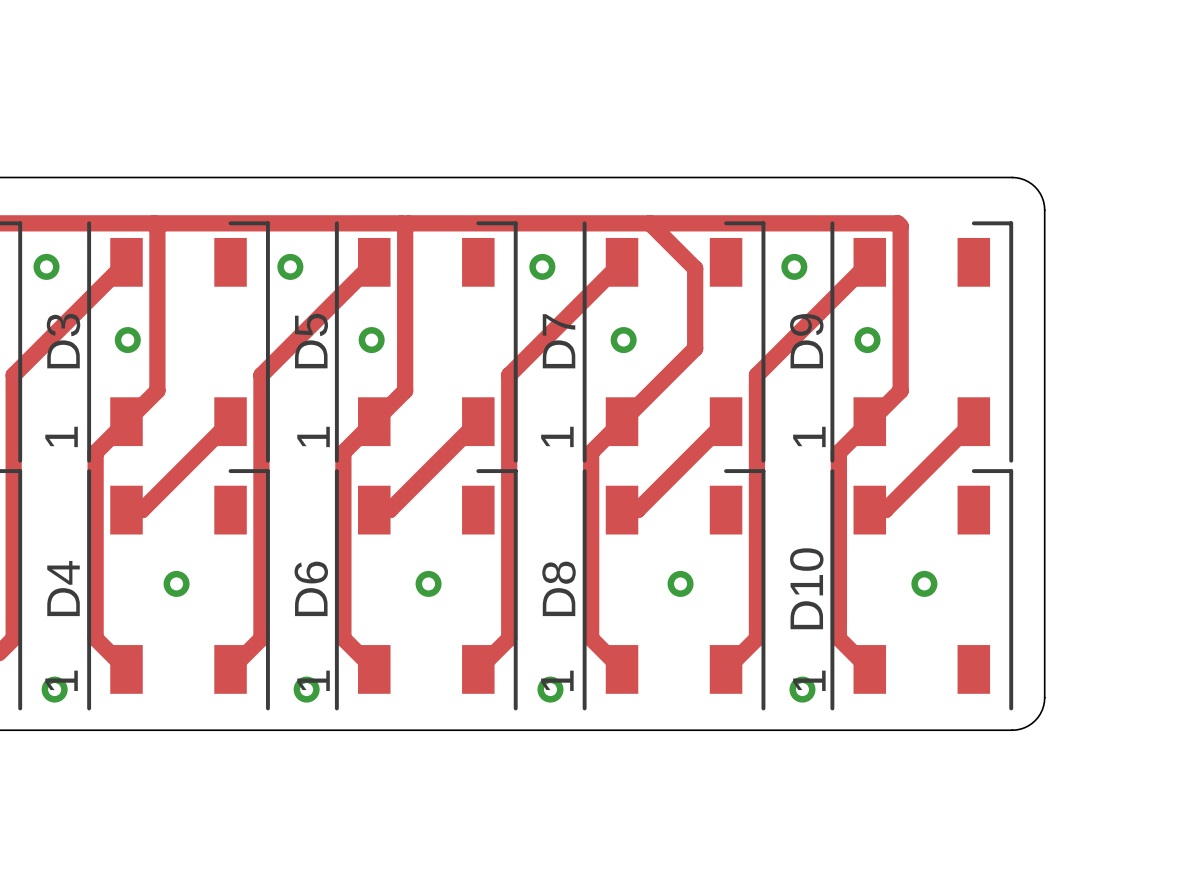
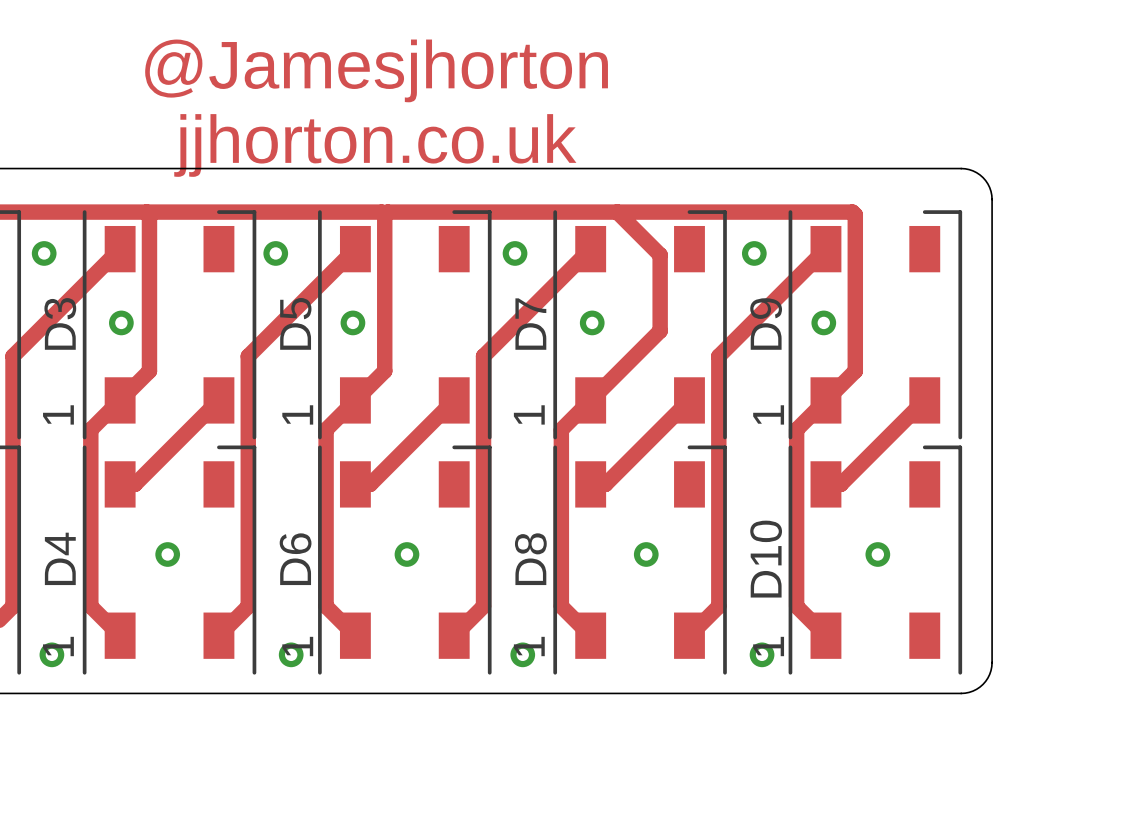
text: none -> @Jamesjhorton (376, 70)
text: none -> jjhorton.co.uk (375, 145)

